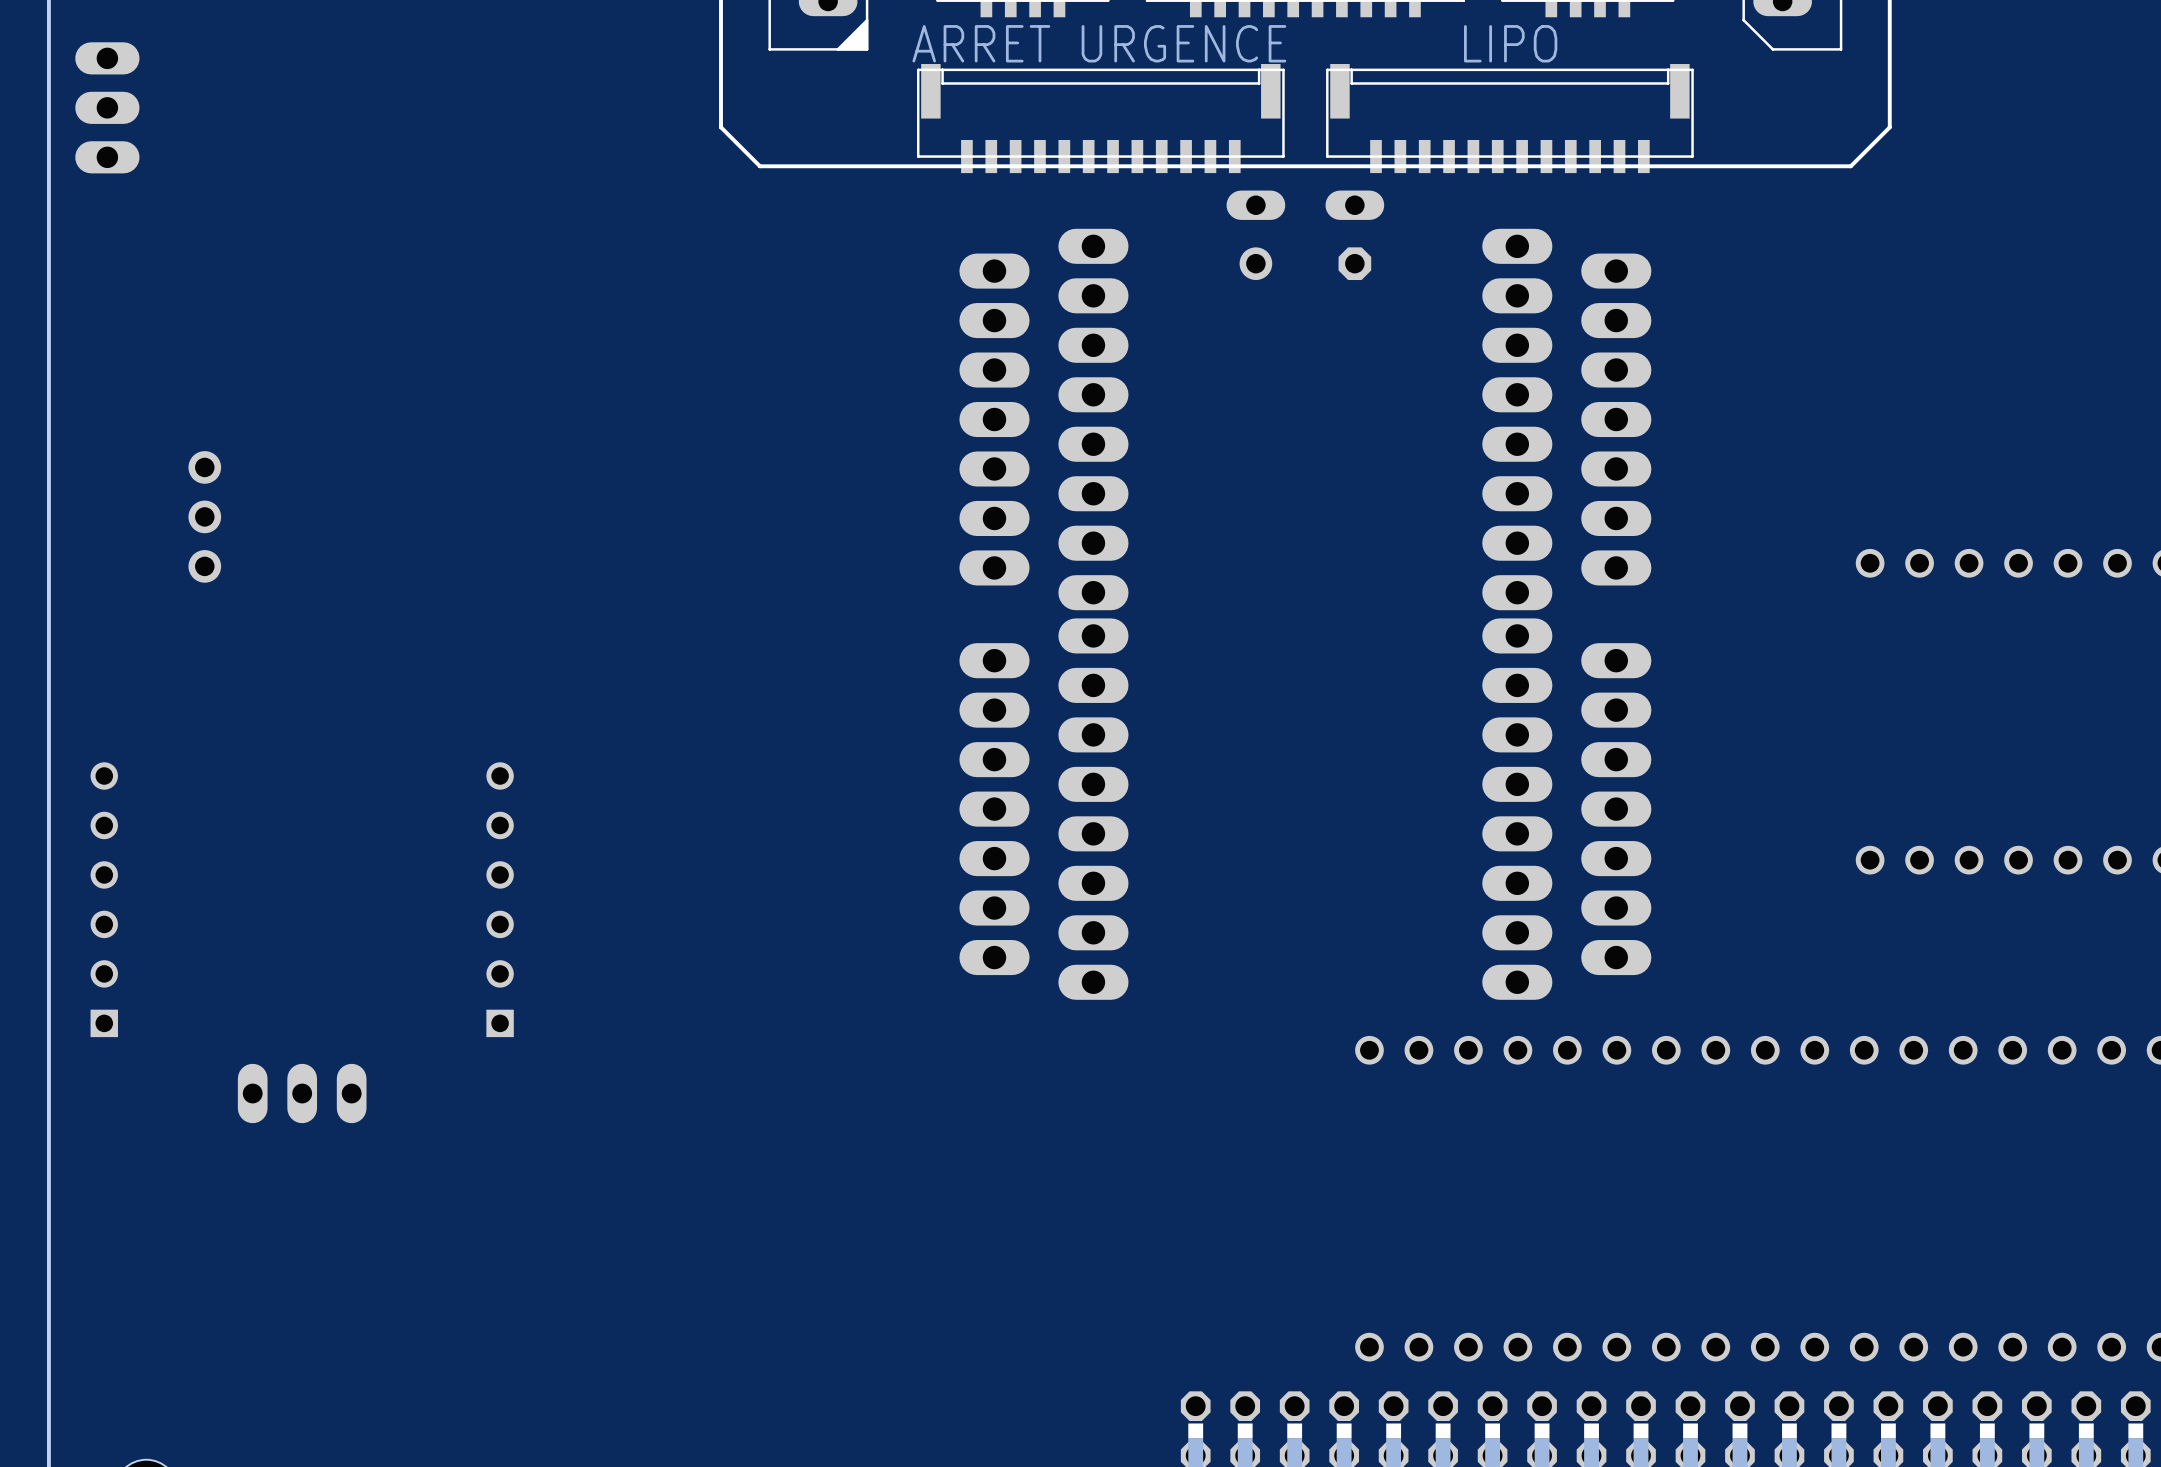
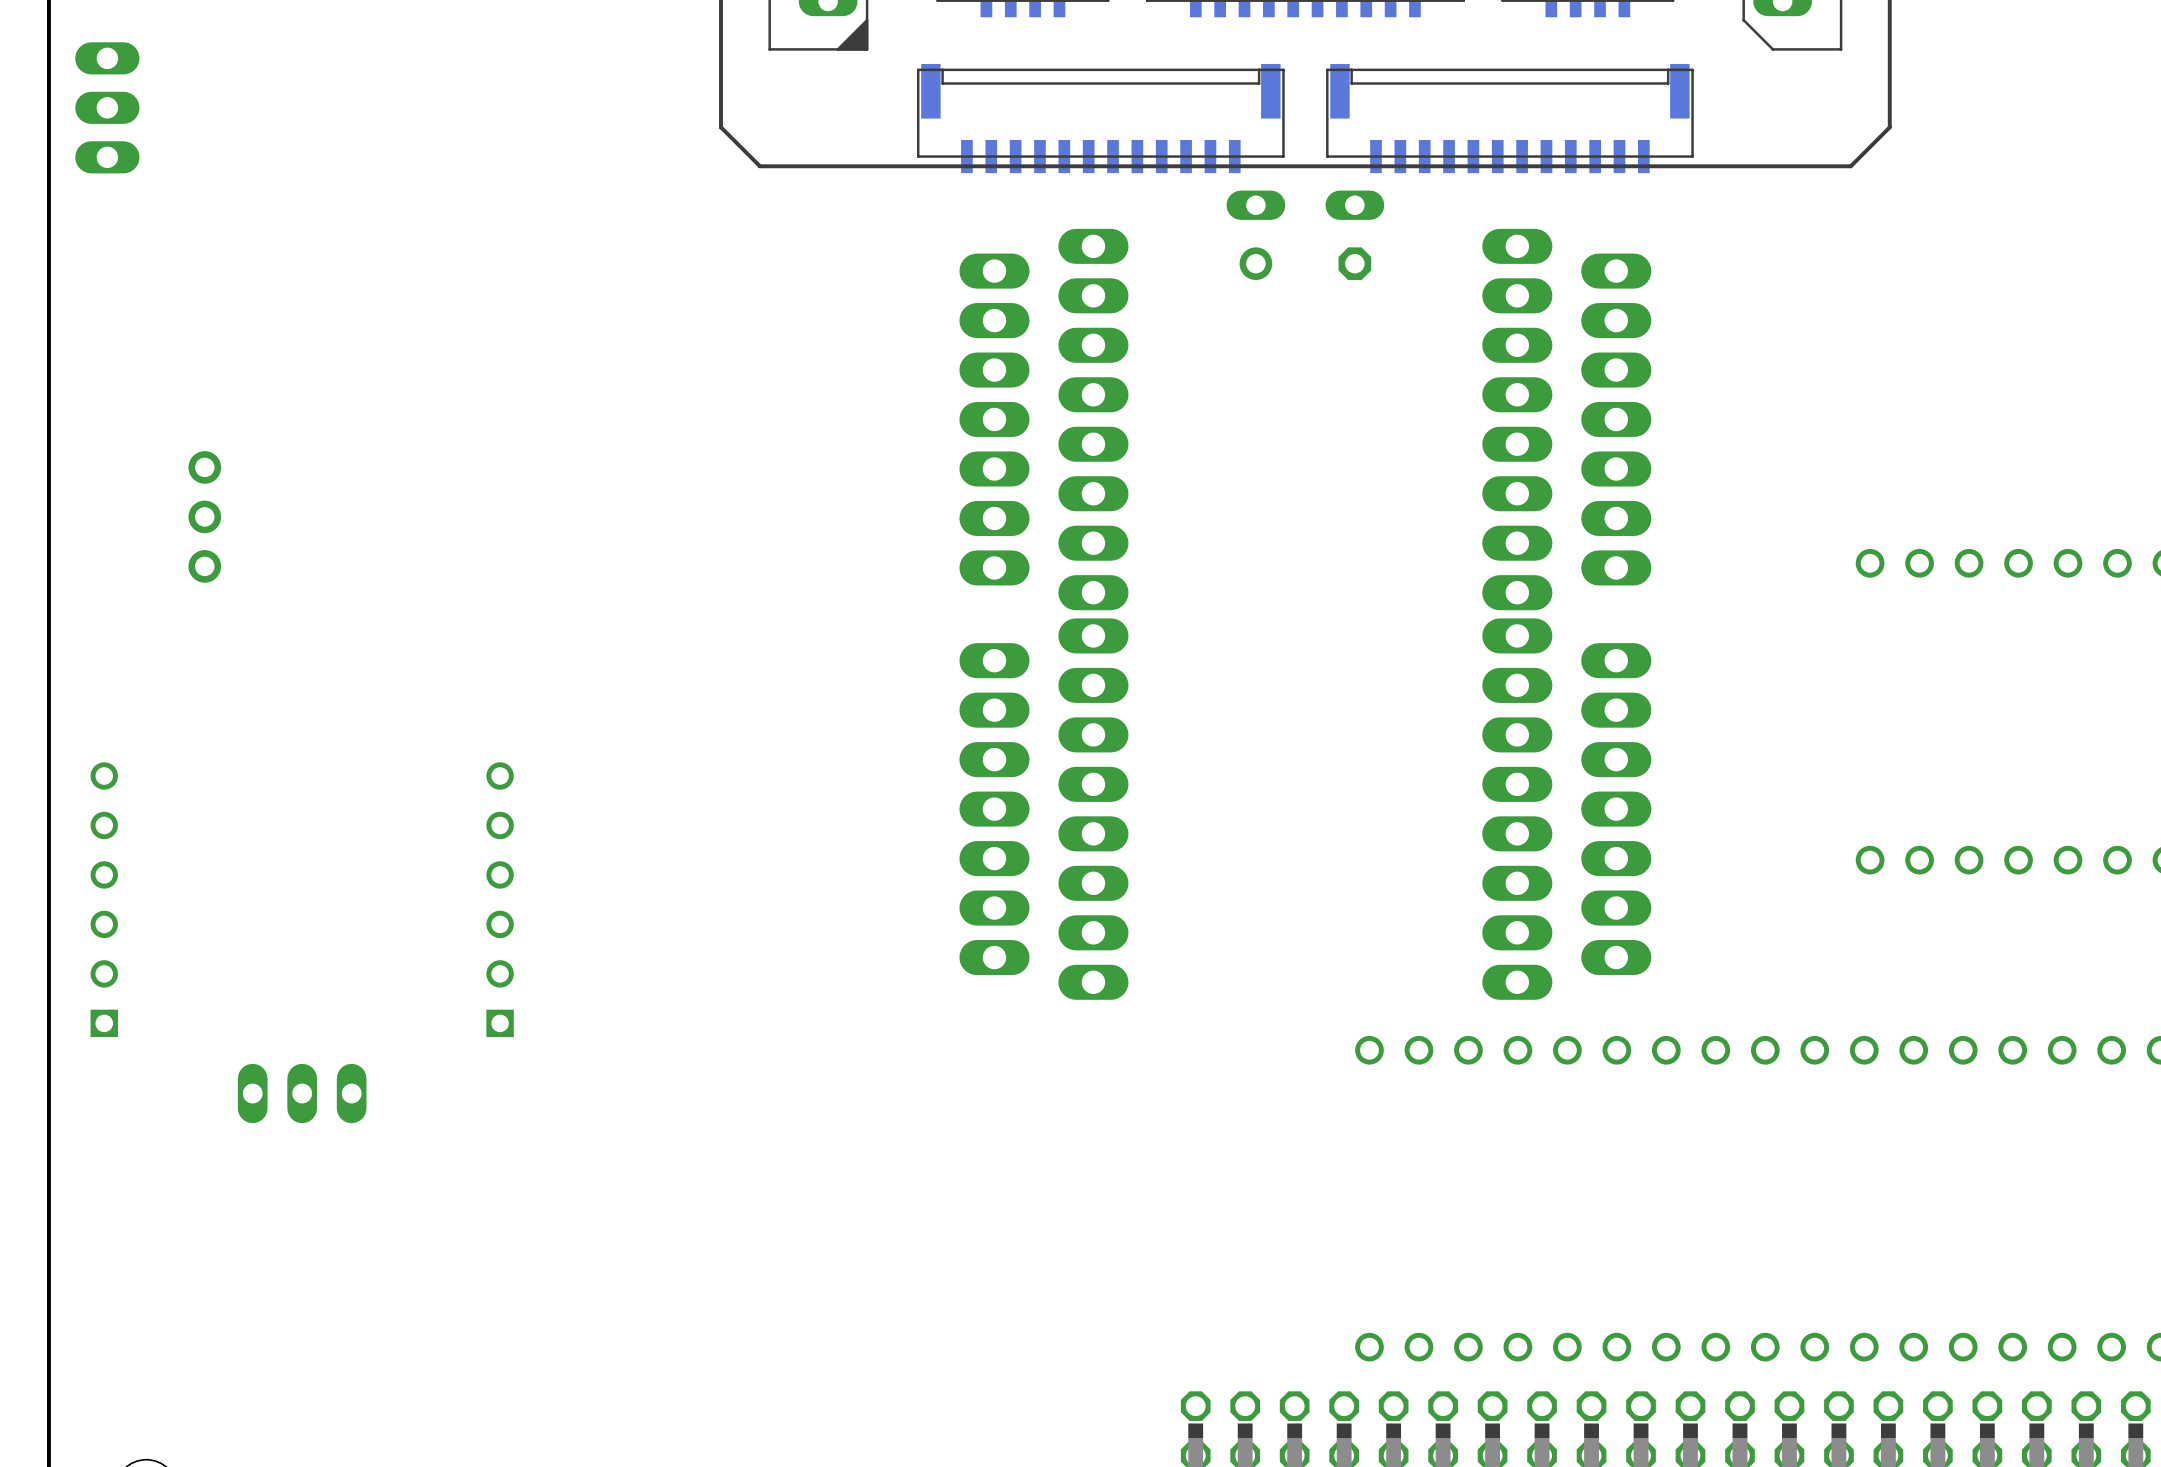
text: ARRET URGENCE (1099, 43) -> none
text: LIPO (1510, 43) -> none

